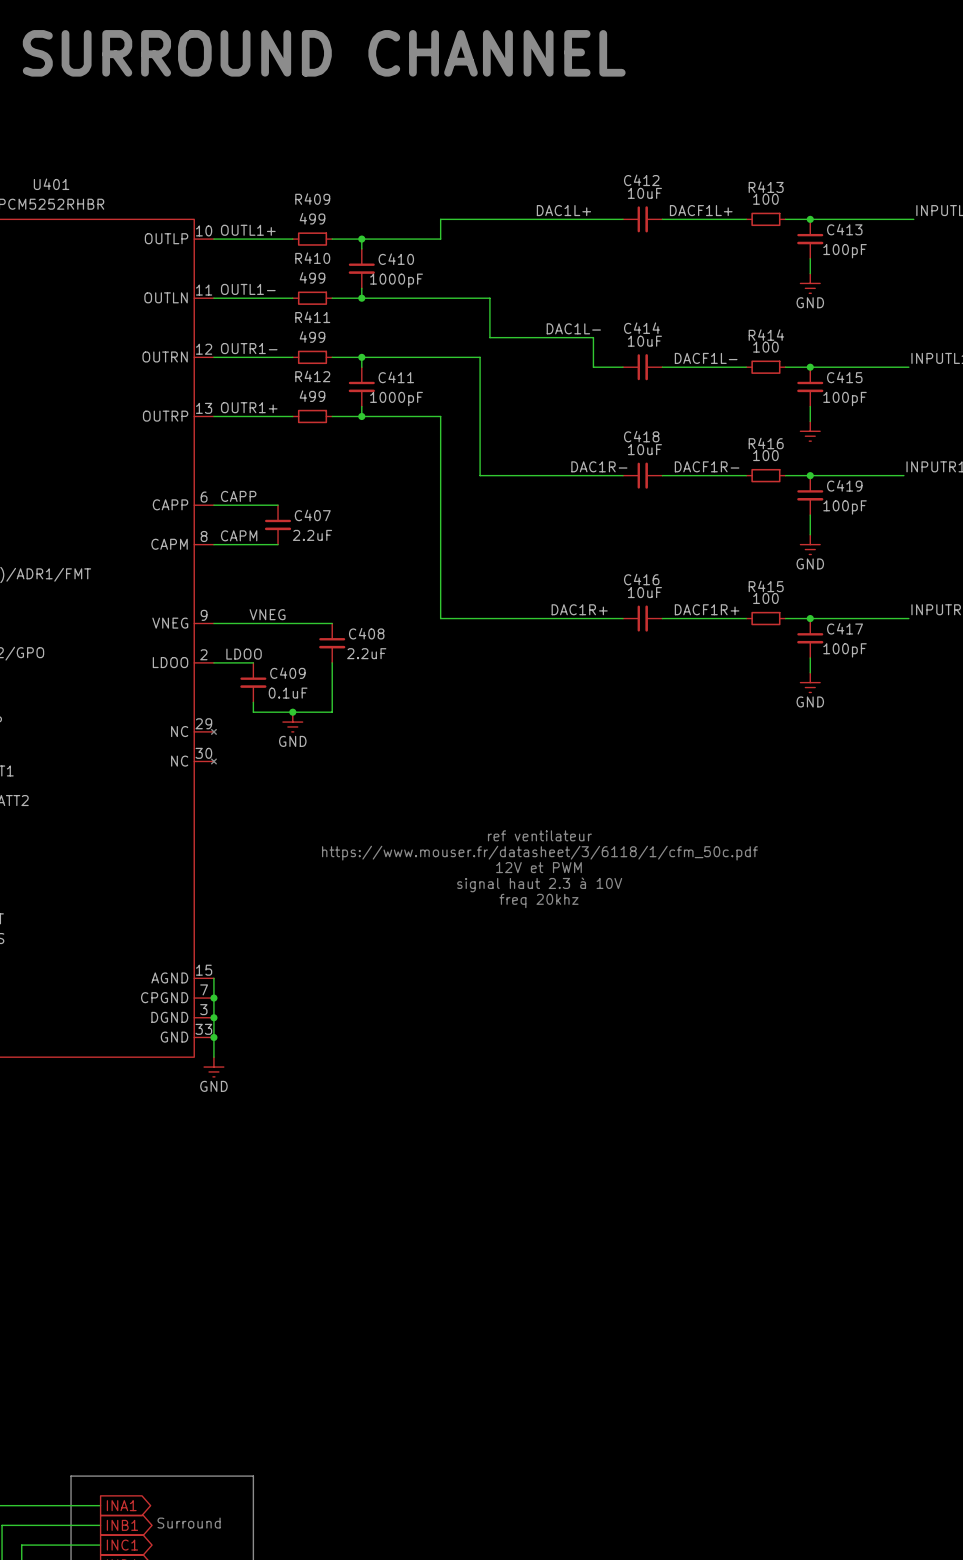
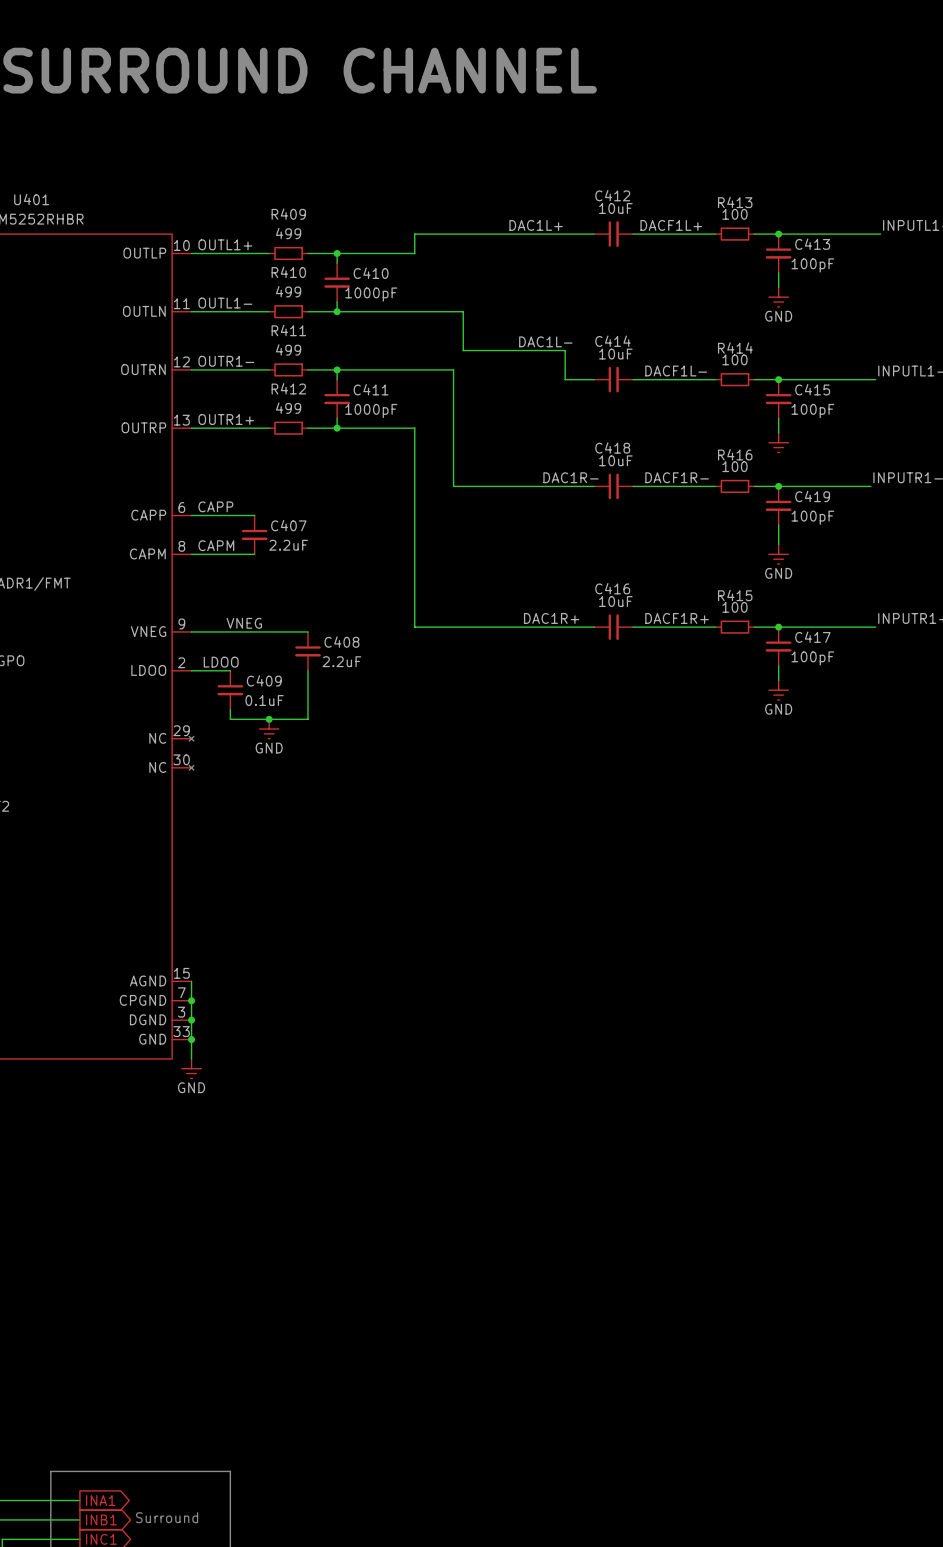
text: ref ventilateur (539, 835) -> none
text: https://www.mouser.fr/datasheet/3/6118/1/cfm_50c.pdf (539, 853) -> none
text: 12V et PWM (538, 867) -> none
text: signal haut 2.3 à 10V (539, 884) -> none
text: freq 20khz (538, 900) -> none

